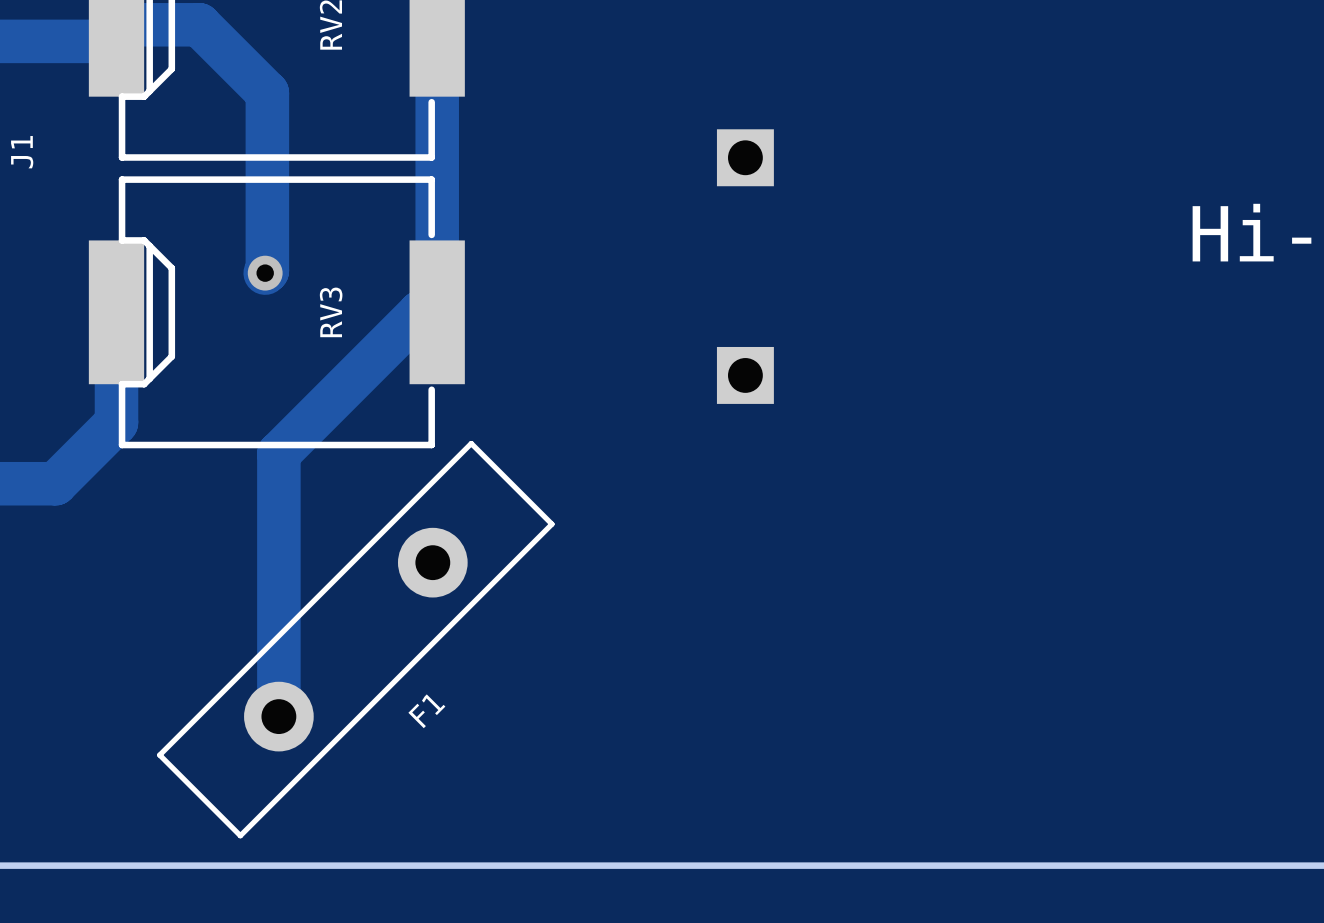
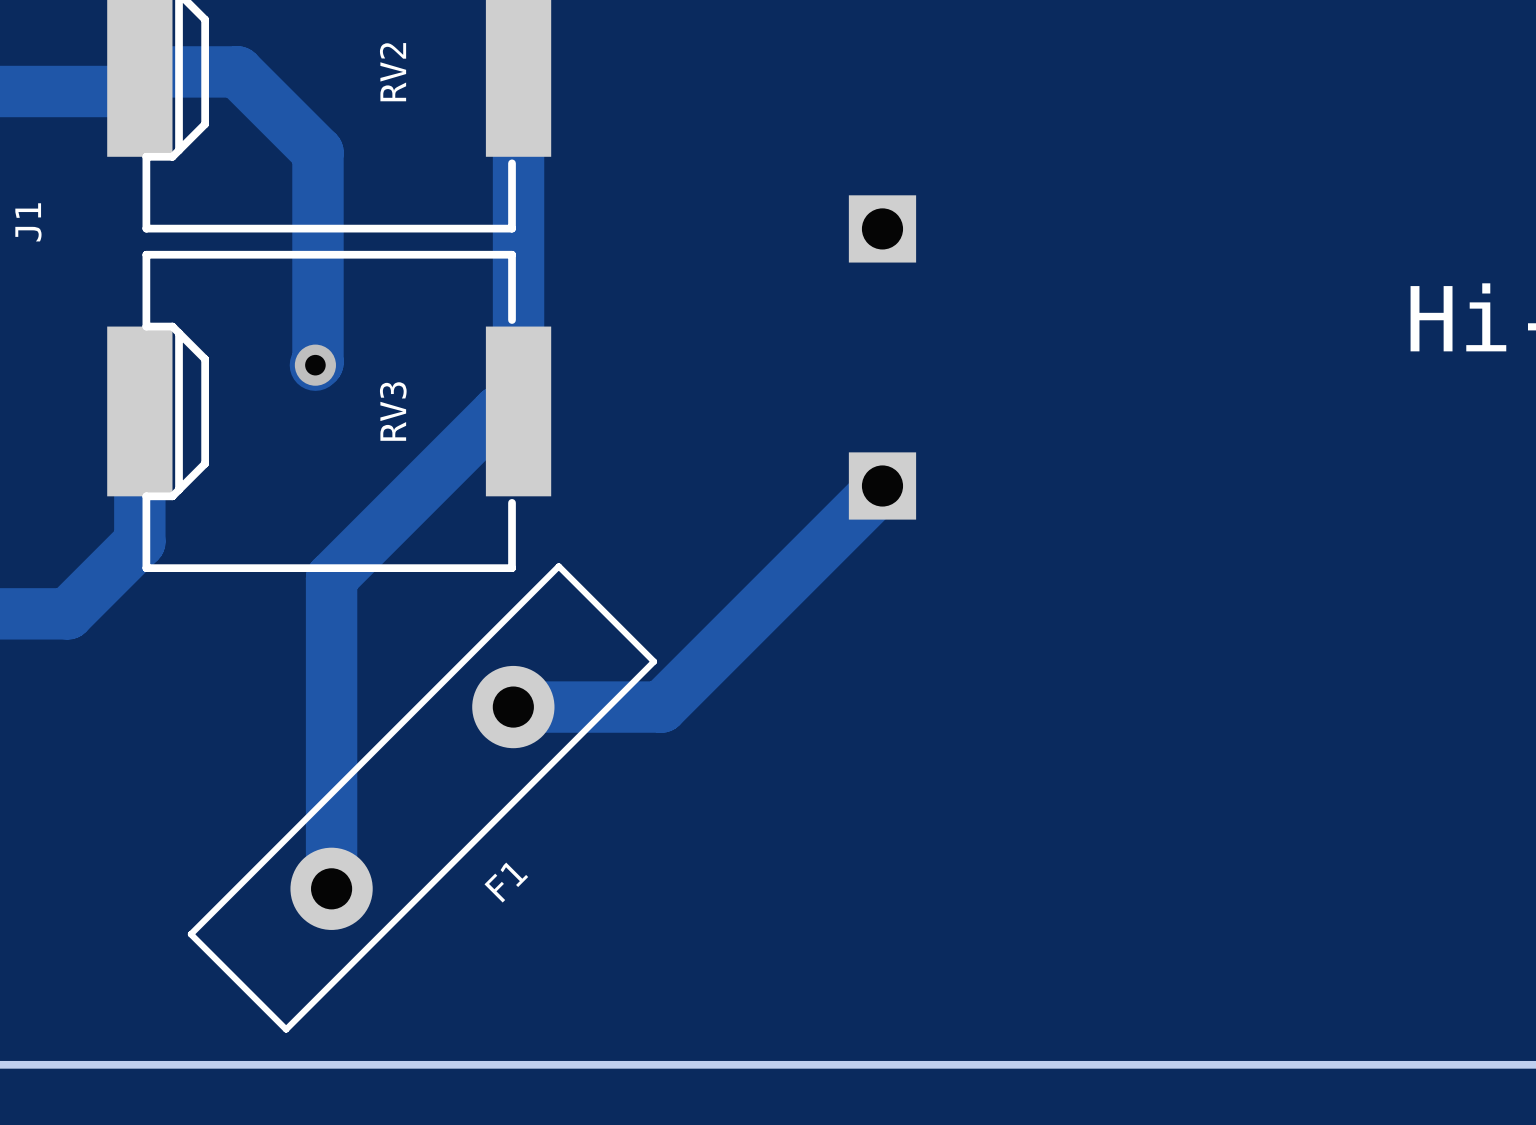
track: none -> (882, 485) (661, 707) (513, 707)

